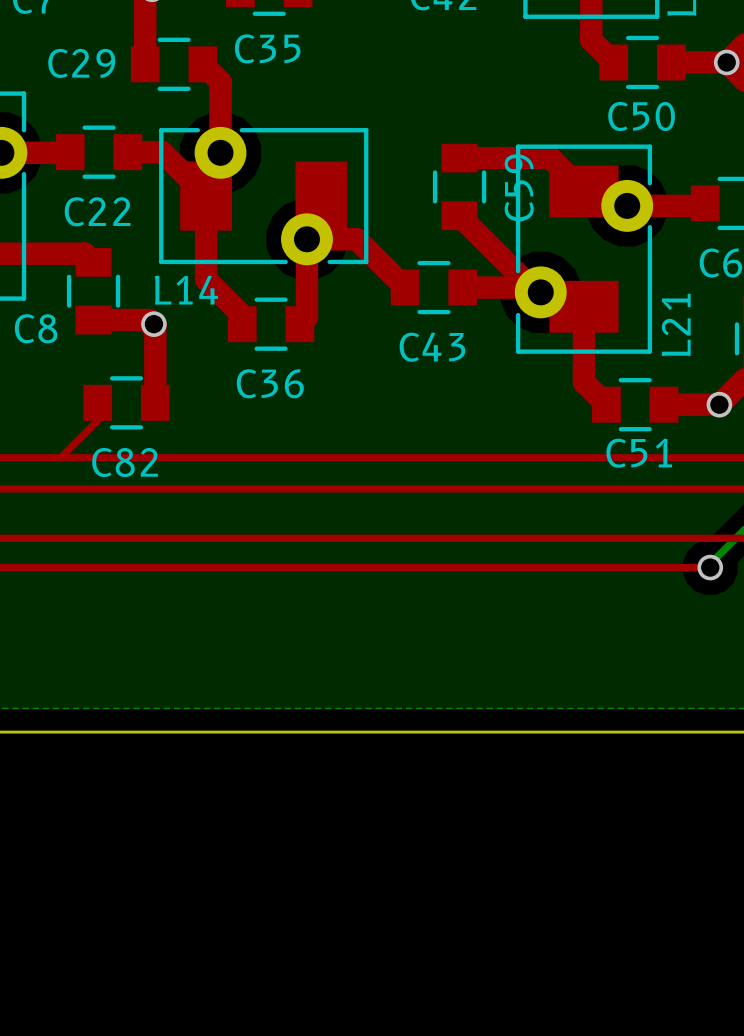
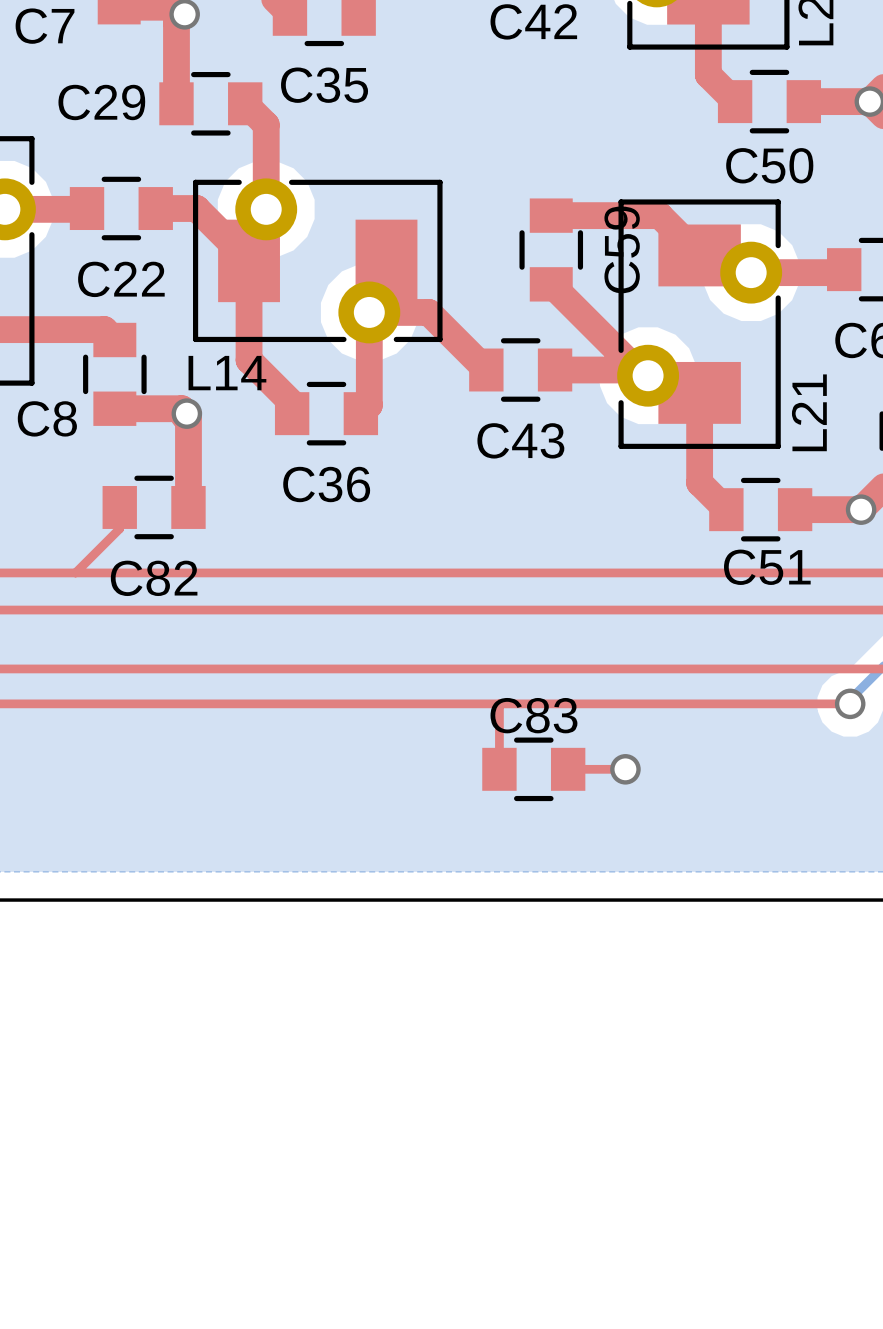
top track: none -> (498, 704) (499, 769)
C83: none -> (533, 769)
top track: none -> (568, 769) (625, 769)
via: none -> (625, 769)

